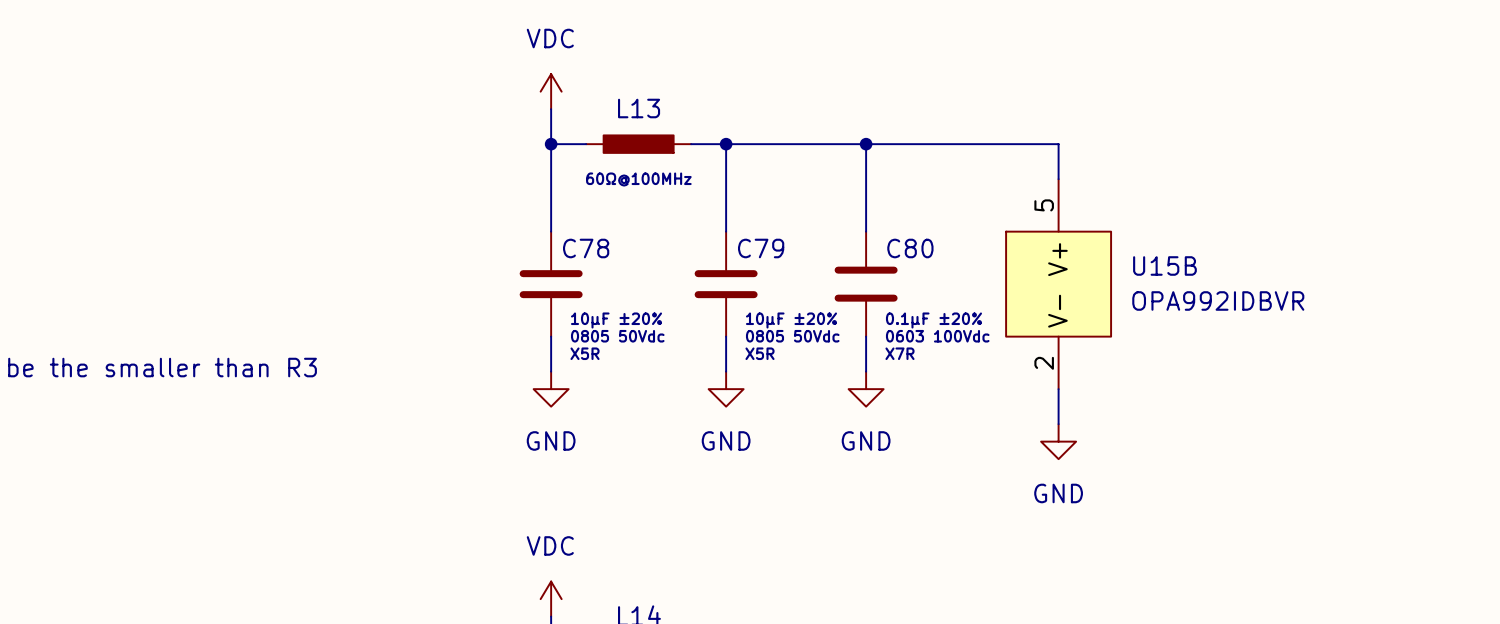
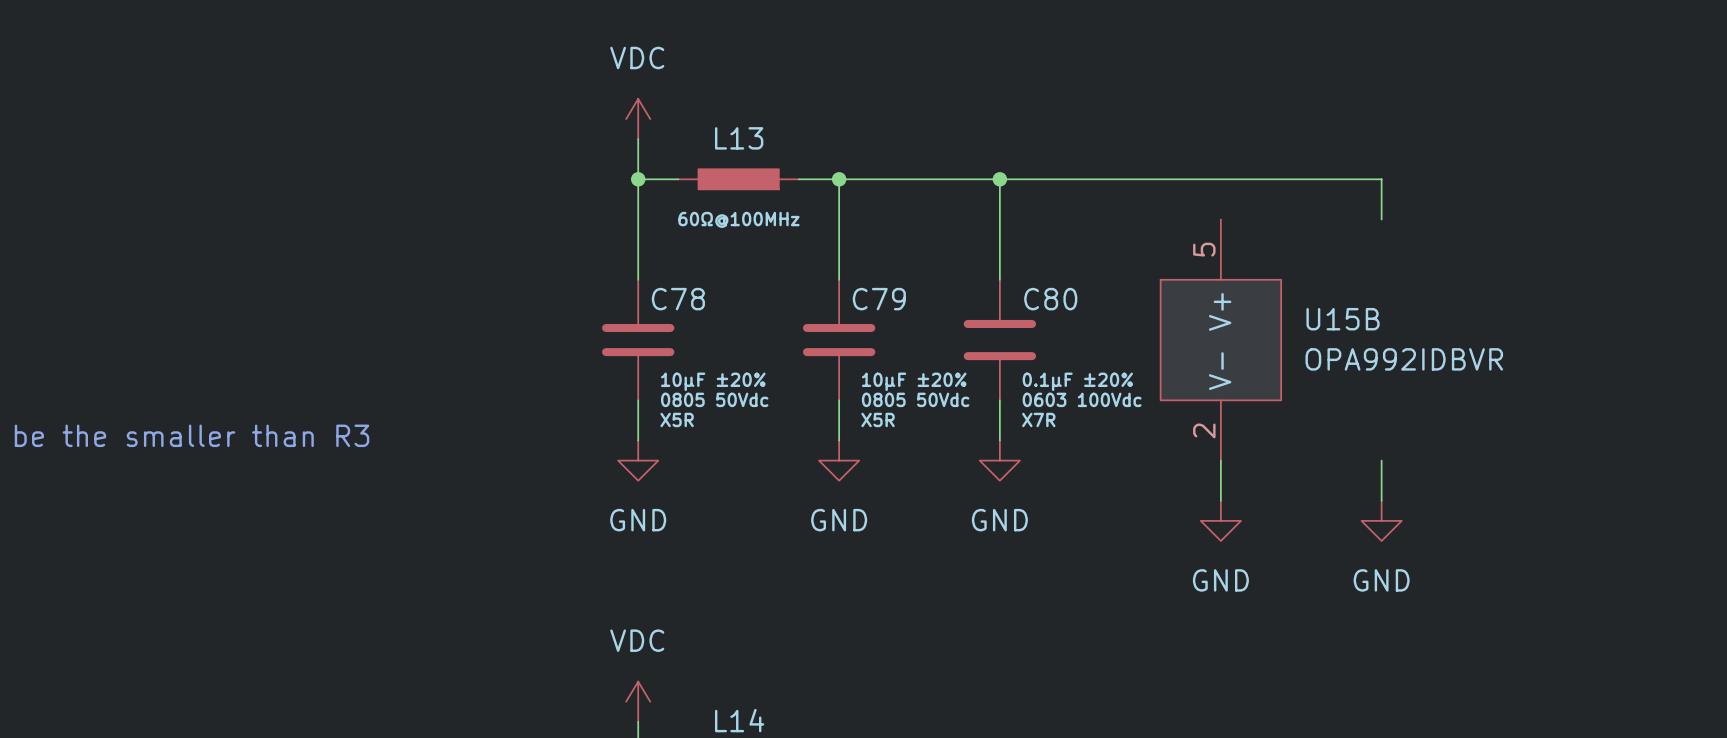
wire: (1058, 144) (1058, 179) -> (1220, 179) (1381, 179) (1381, 219)
wire: none -> (1381, 460) (1381, 500)
power symbol: none -> GND (1381, 520)

